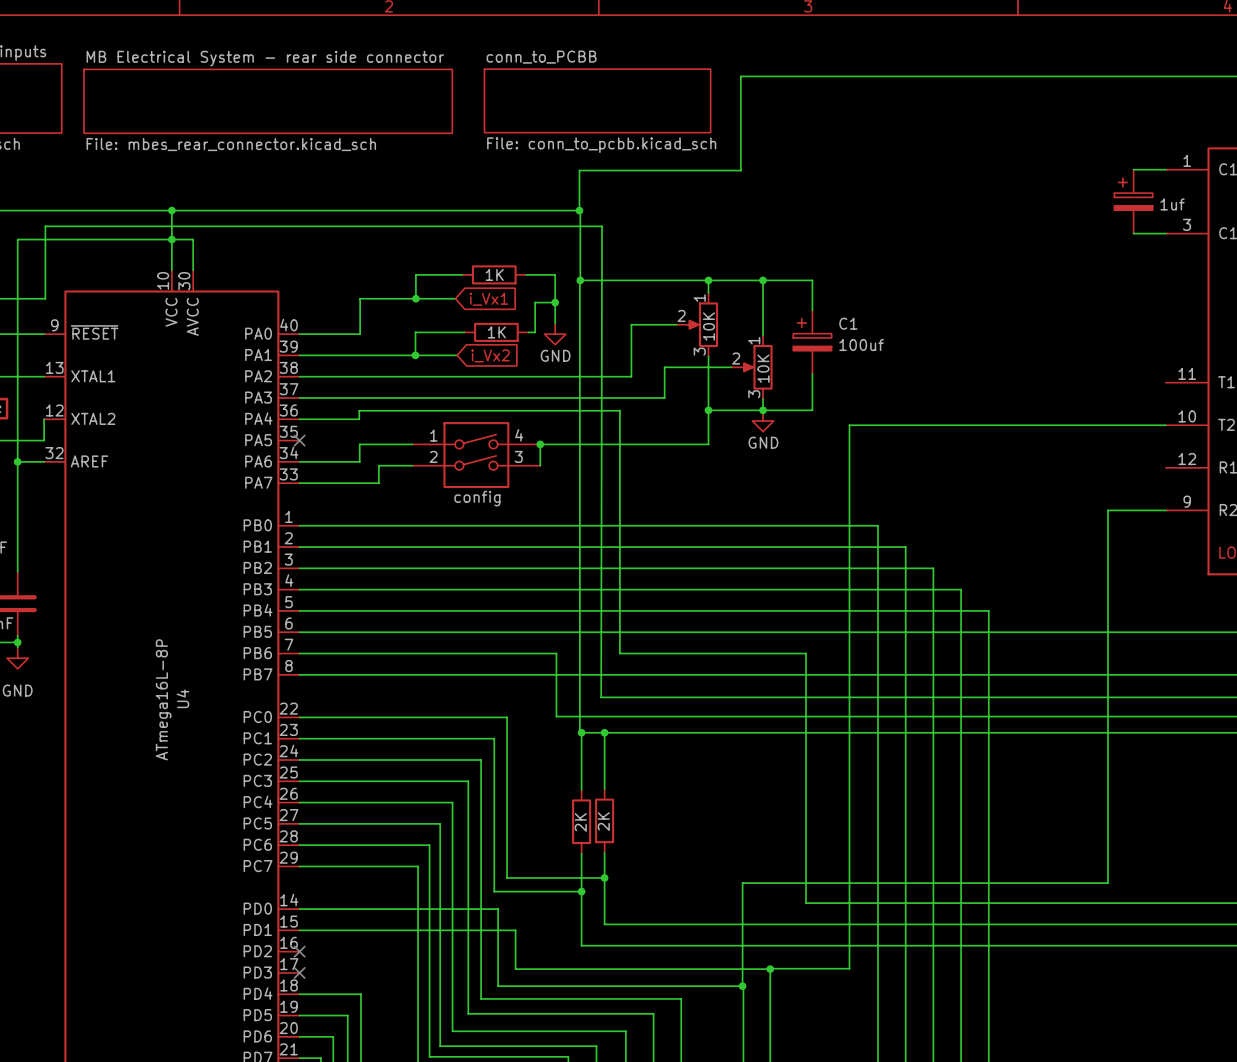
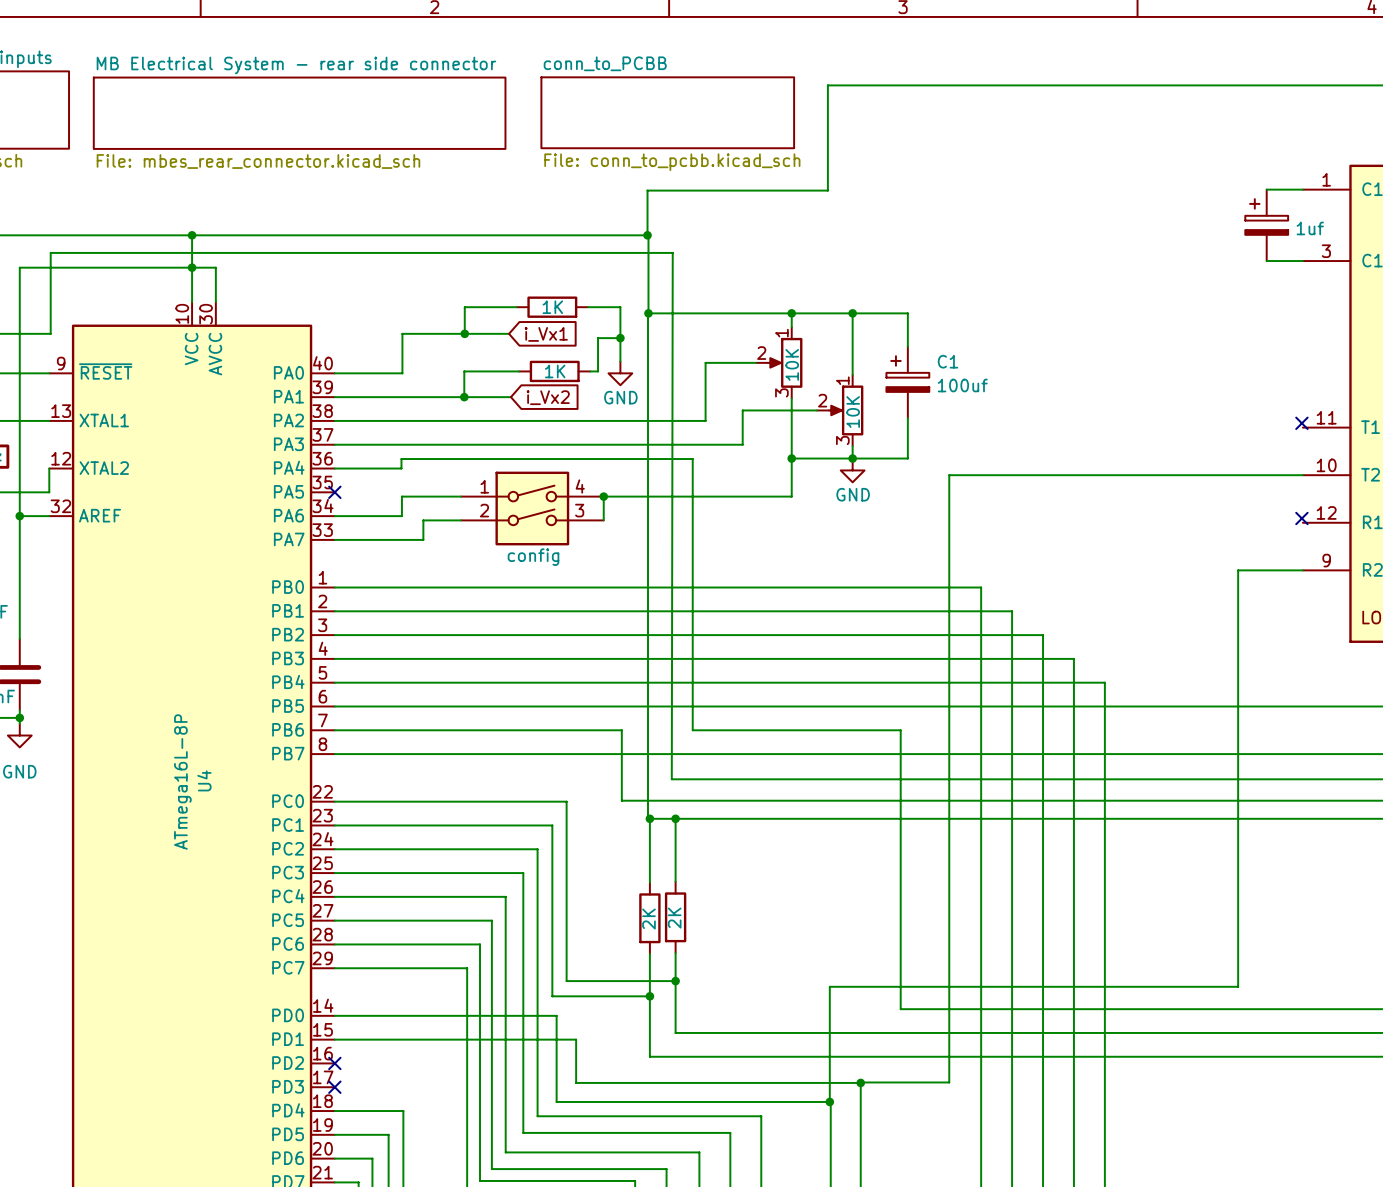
no-connect mark: none -> (1301, 423)
no-connect mark: none -> (1301, 518)

